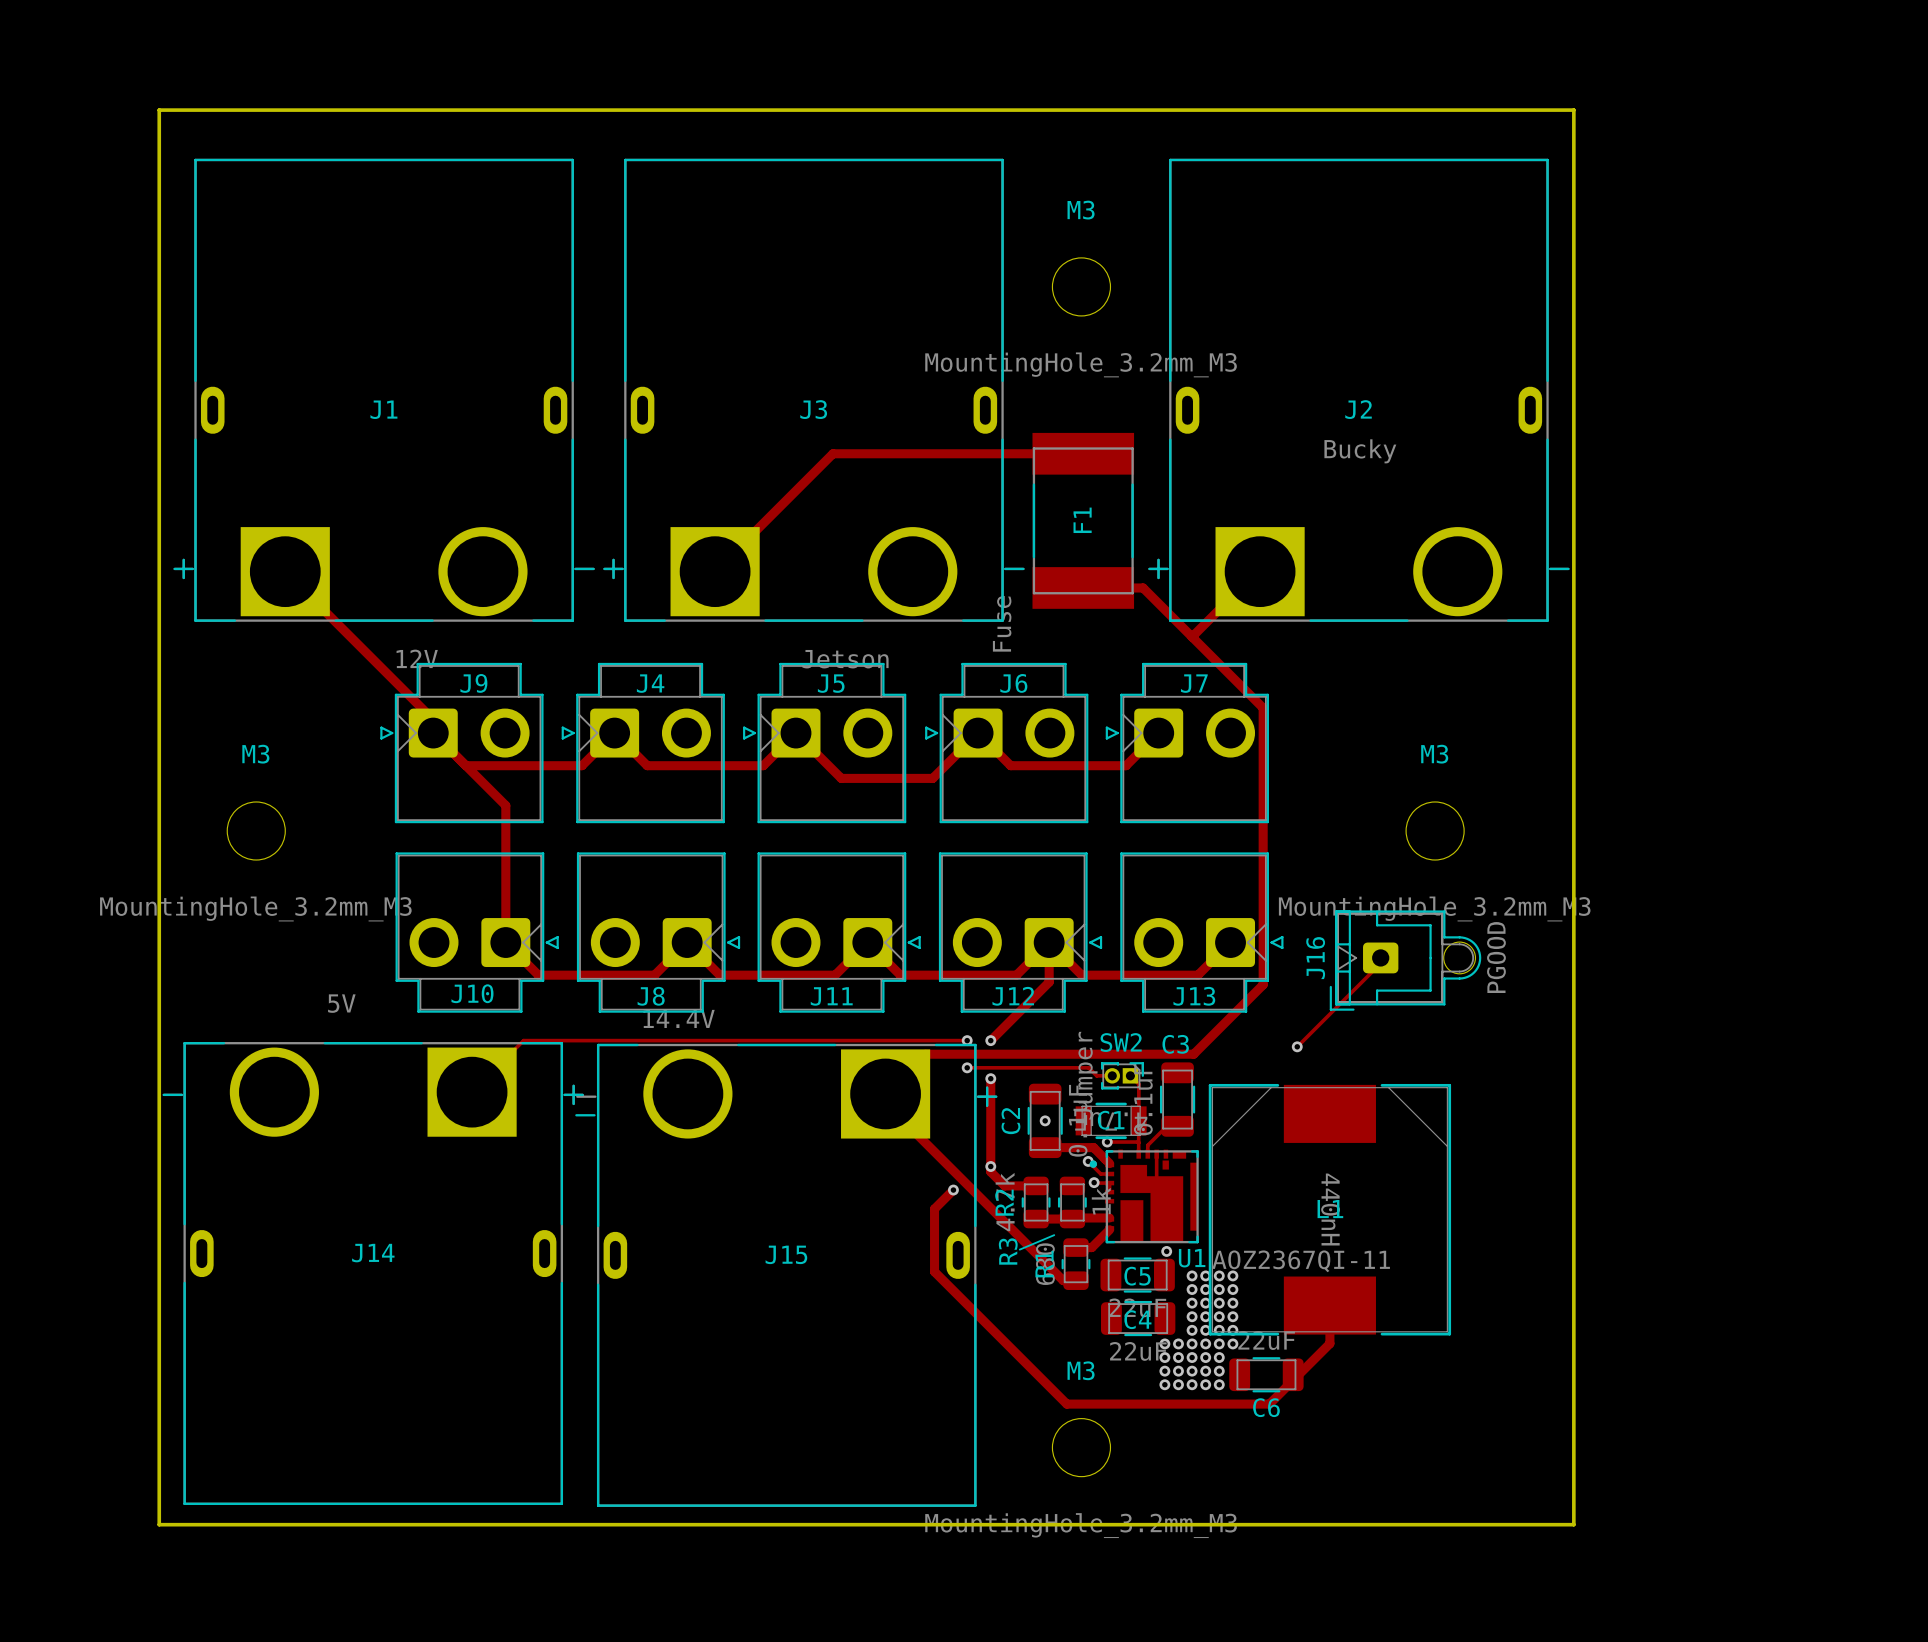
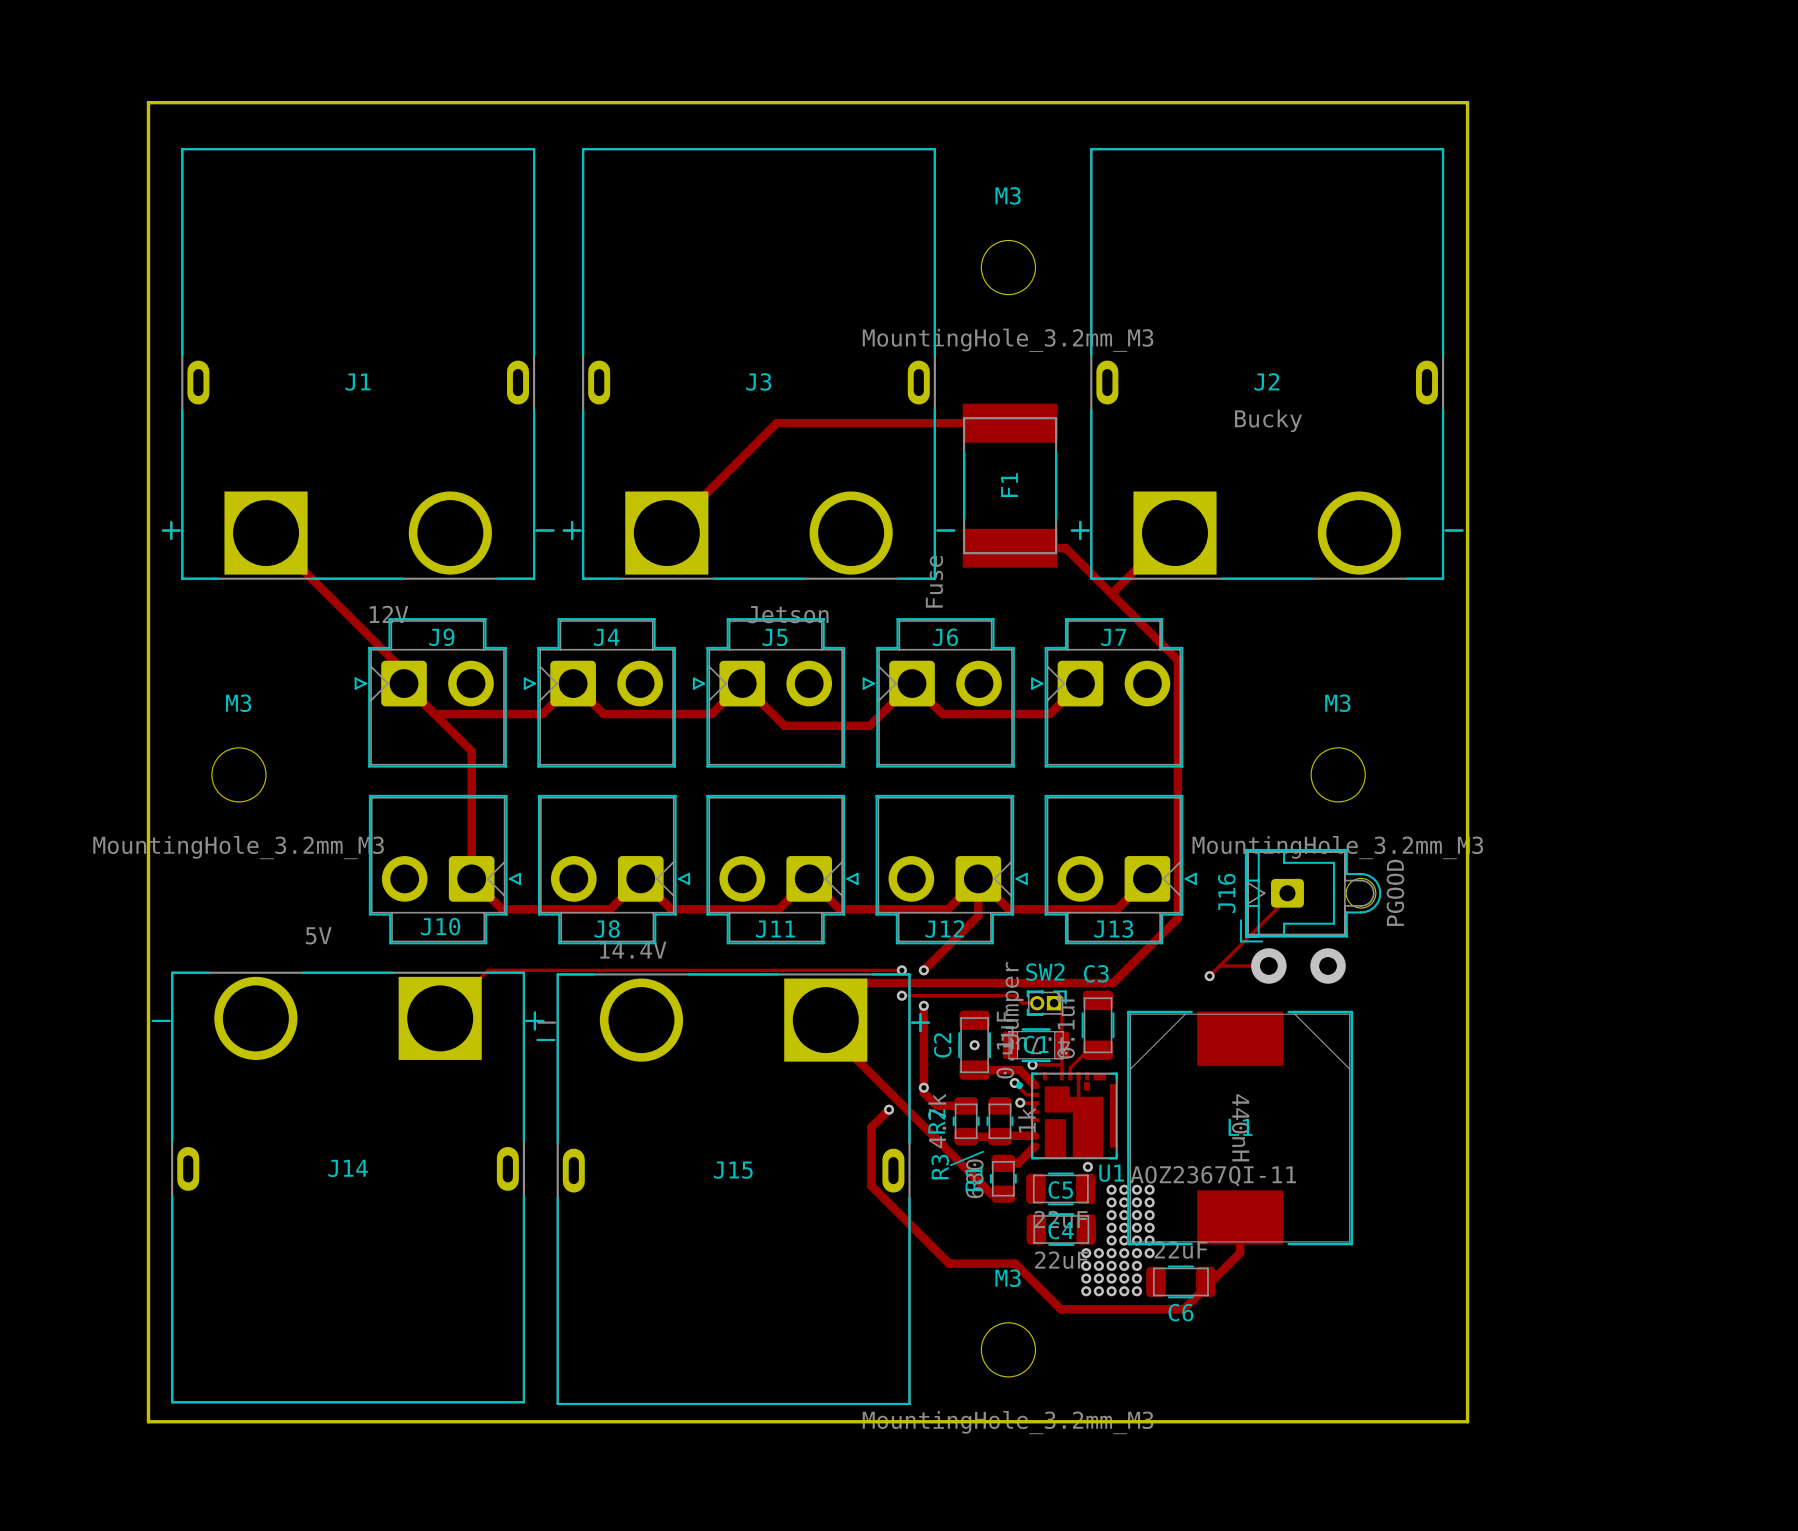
track: none -> (1219, 965) (1268, 965)
via: none -> (1268, 965)
via: none -> (1328, 965)
track: (1017, 1355) (1066, 1404) (1137, 1404) -> (949, 1263) (1015, 1263) (1060, 1309)

